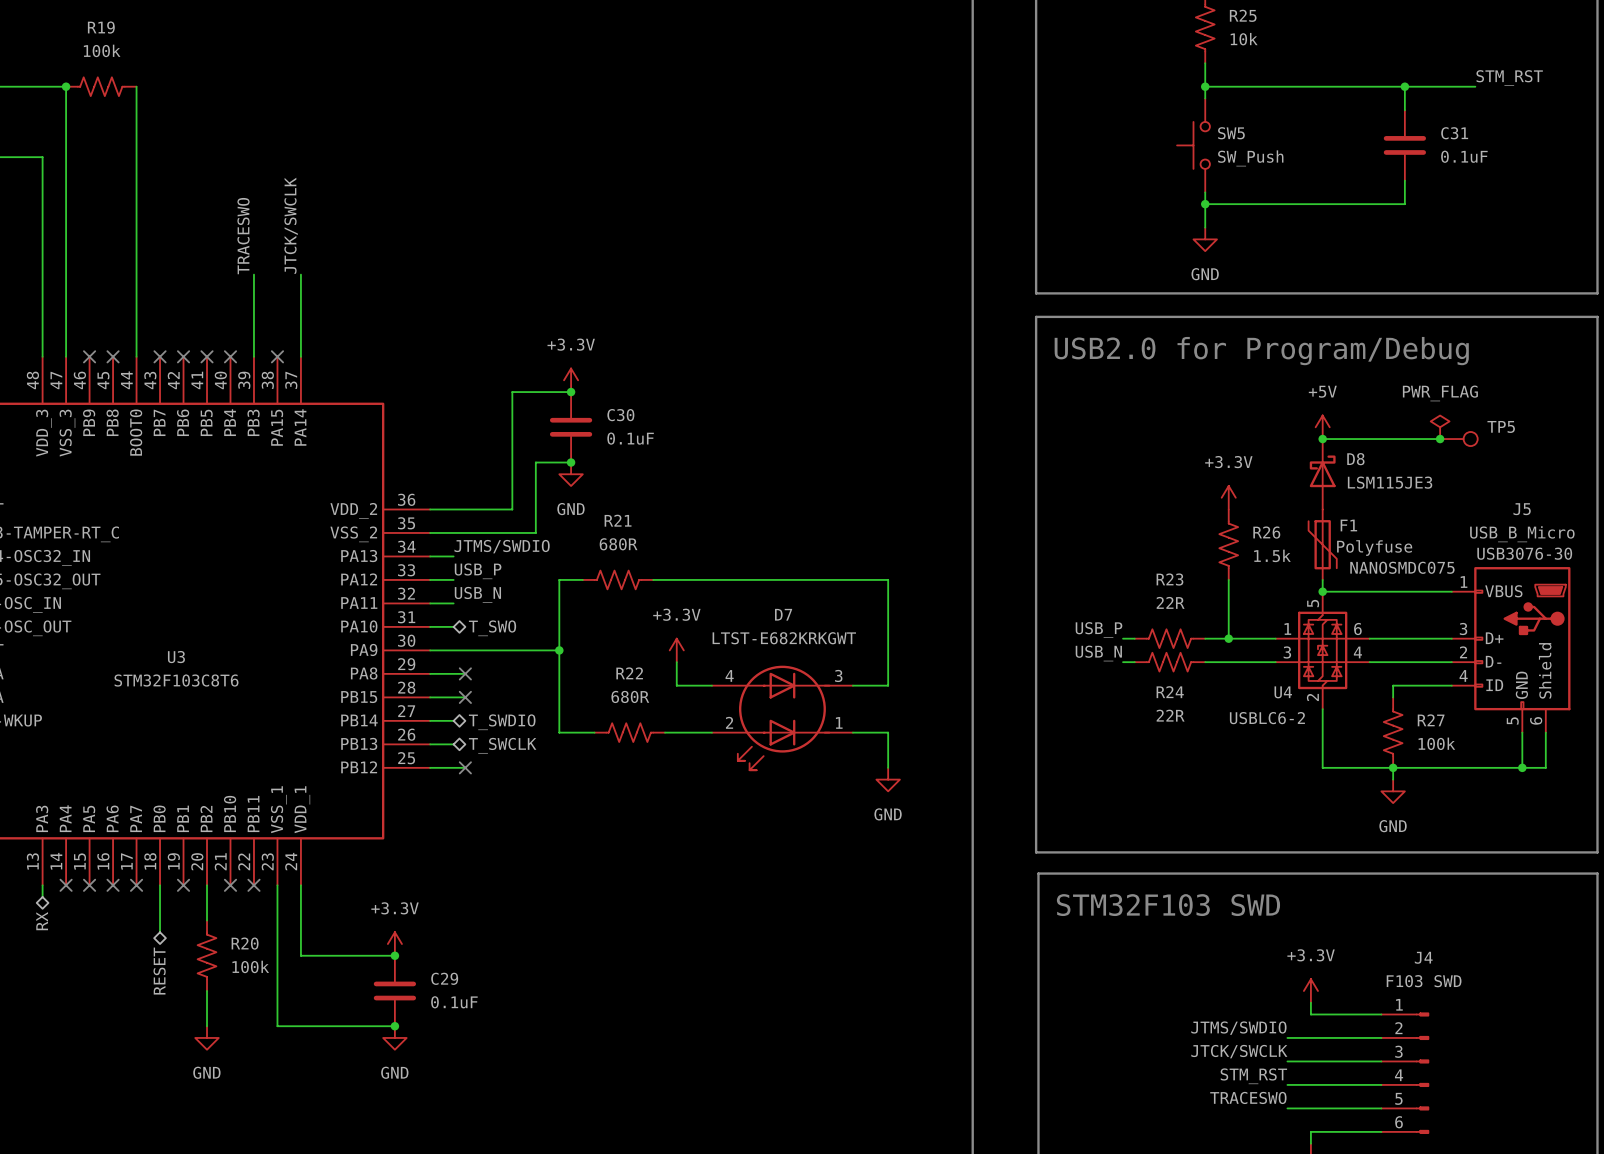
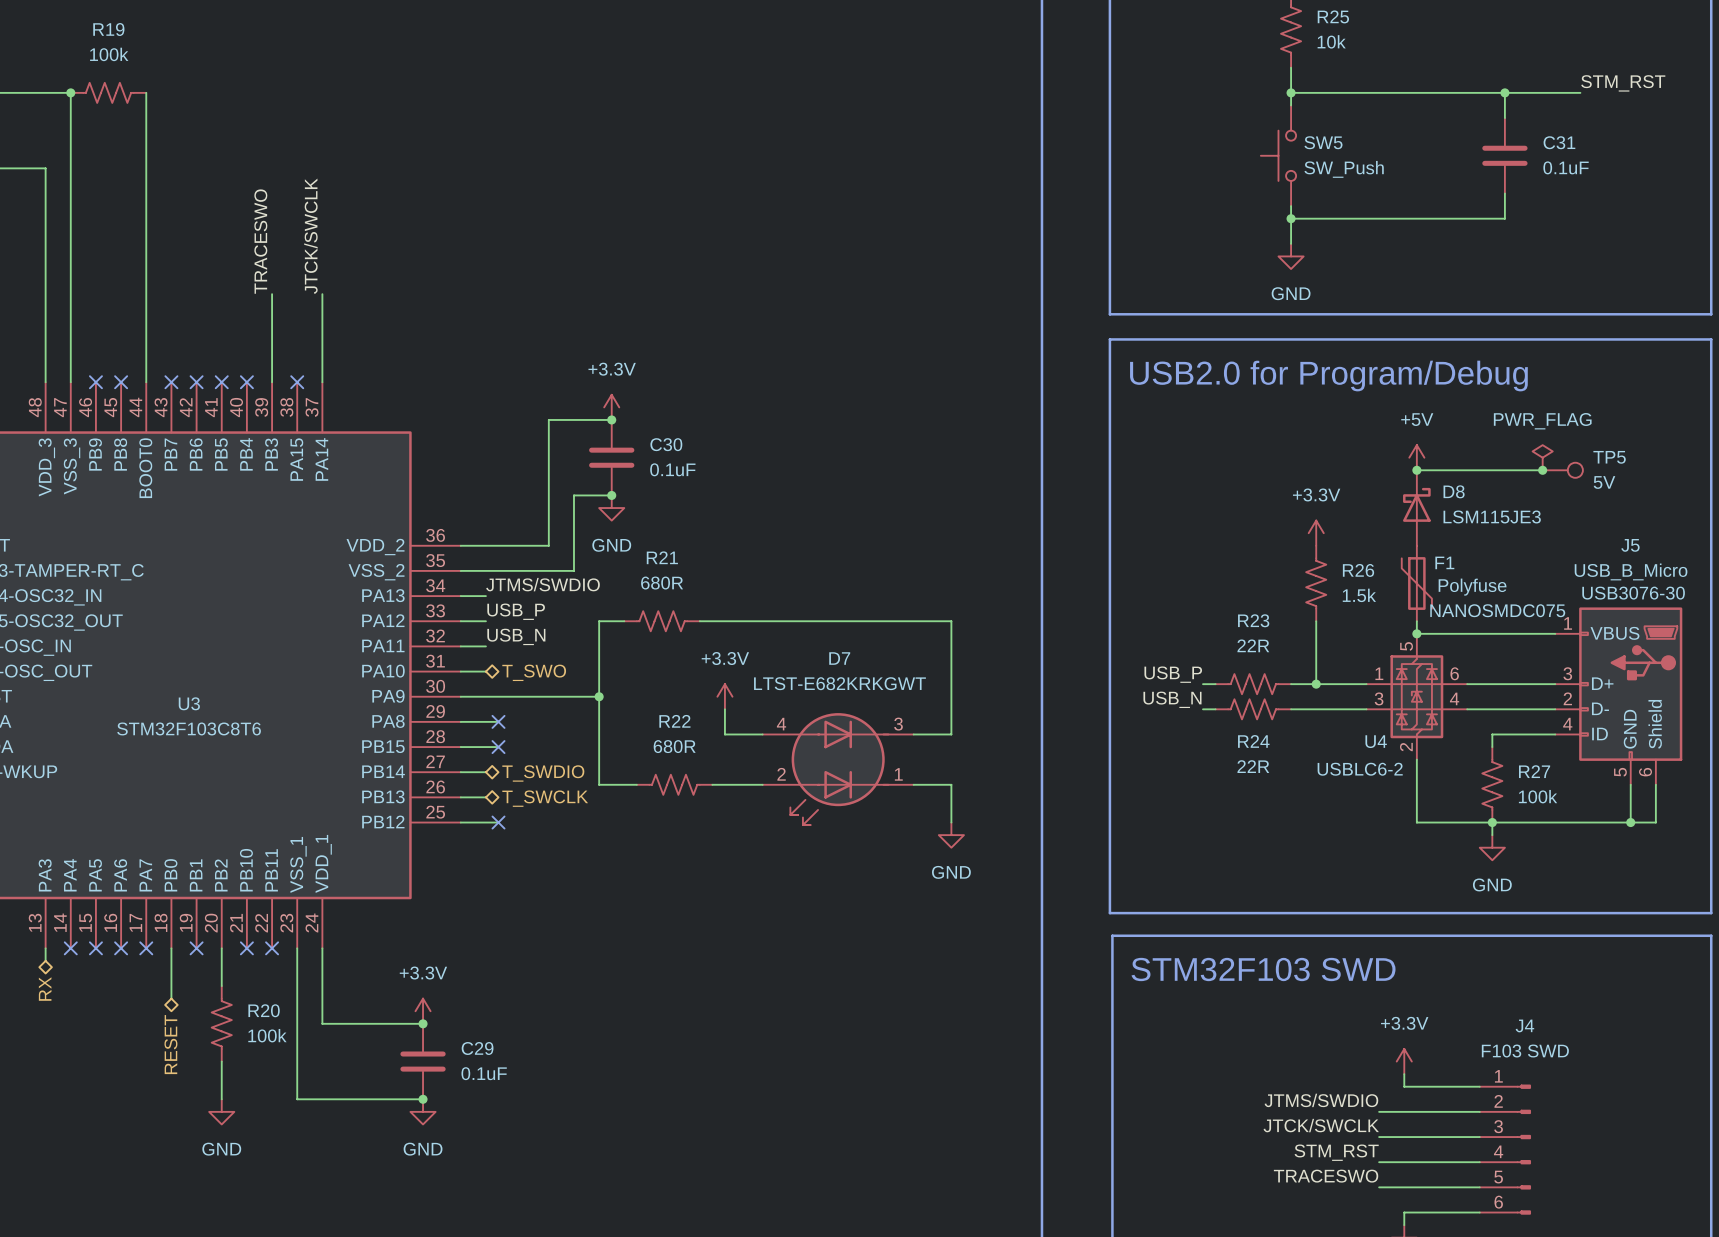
TP5 value: none -> 5V (1604, 482)
F1 text: NANOSMDC075 (1402, 567) -> none
F1 text: none -> NANOSMDC075 (1497, 610)

